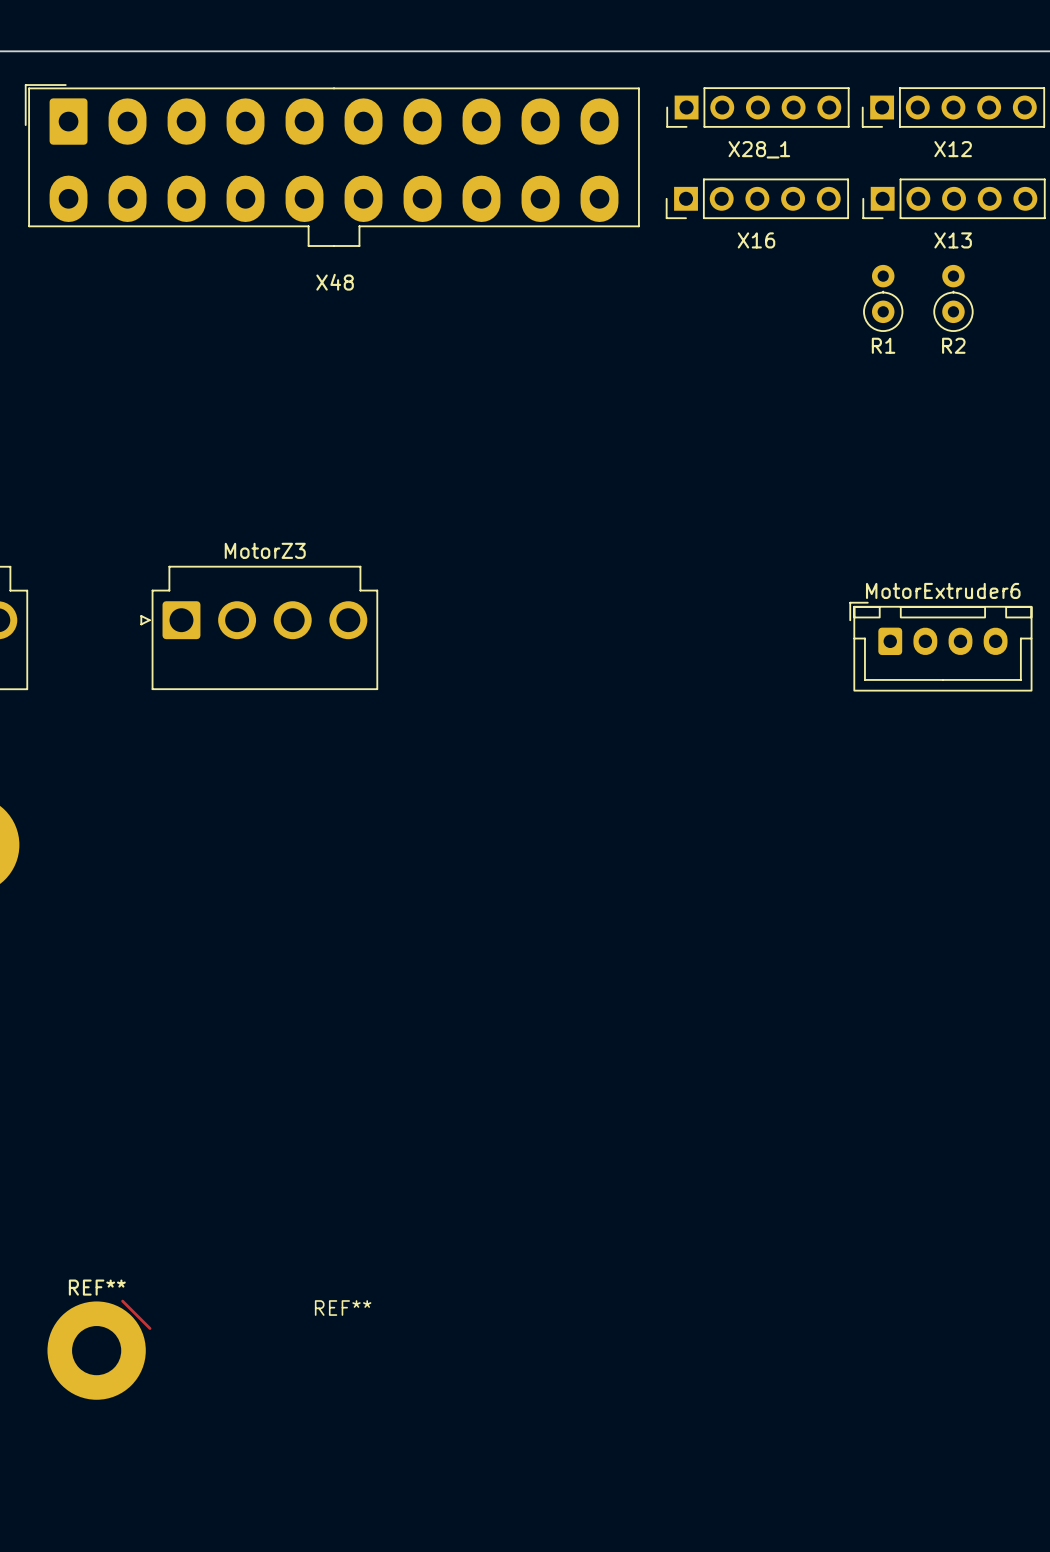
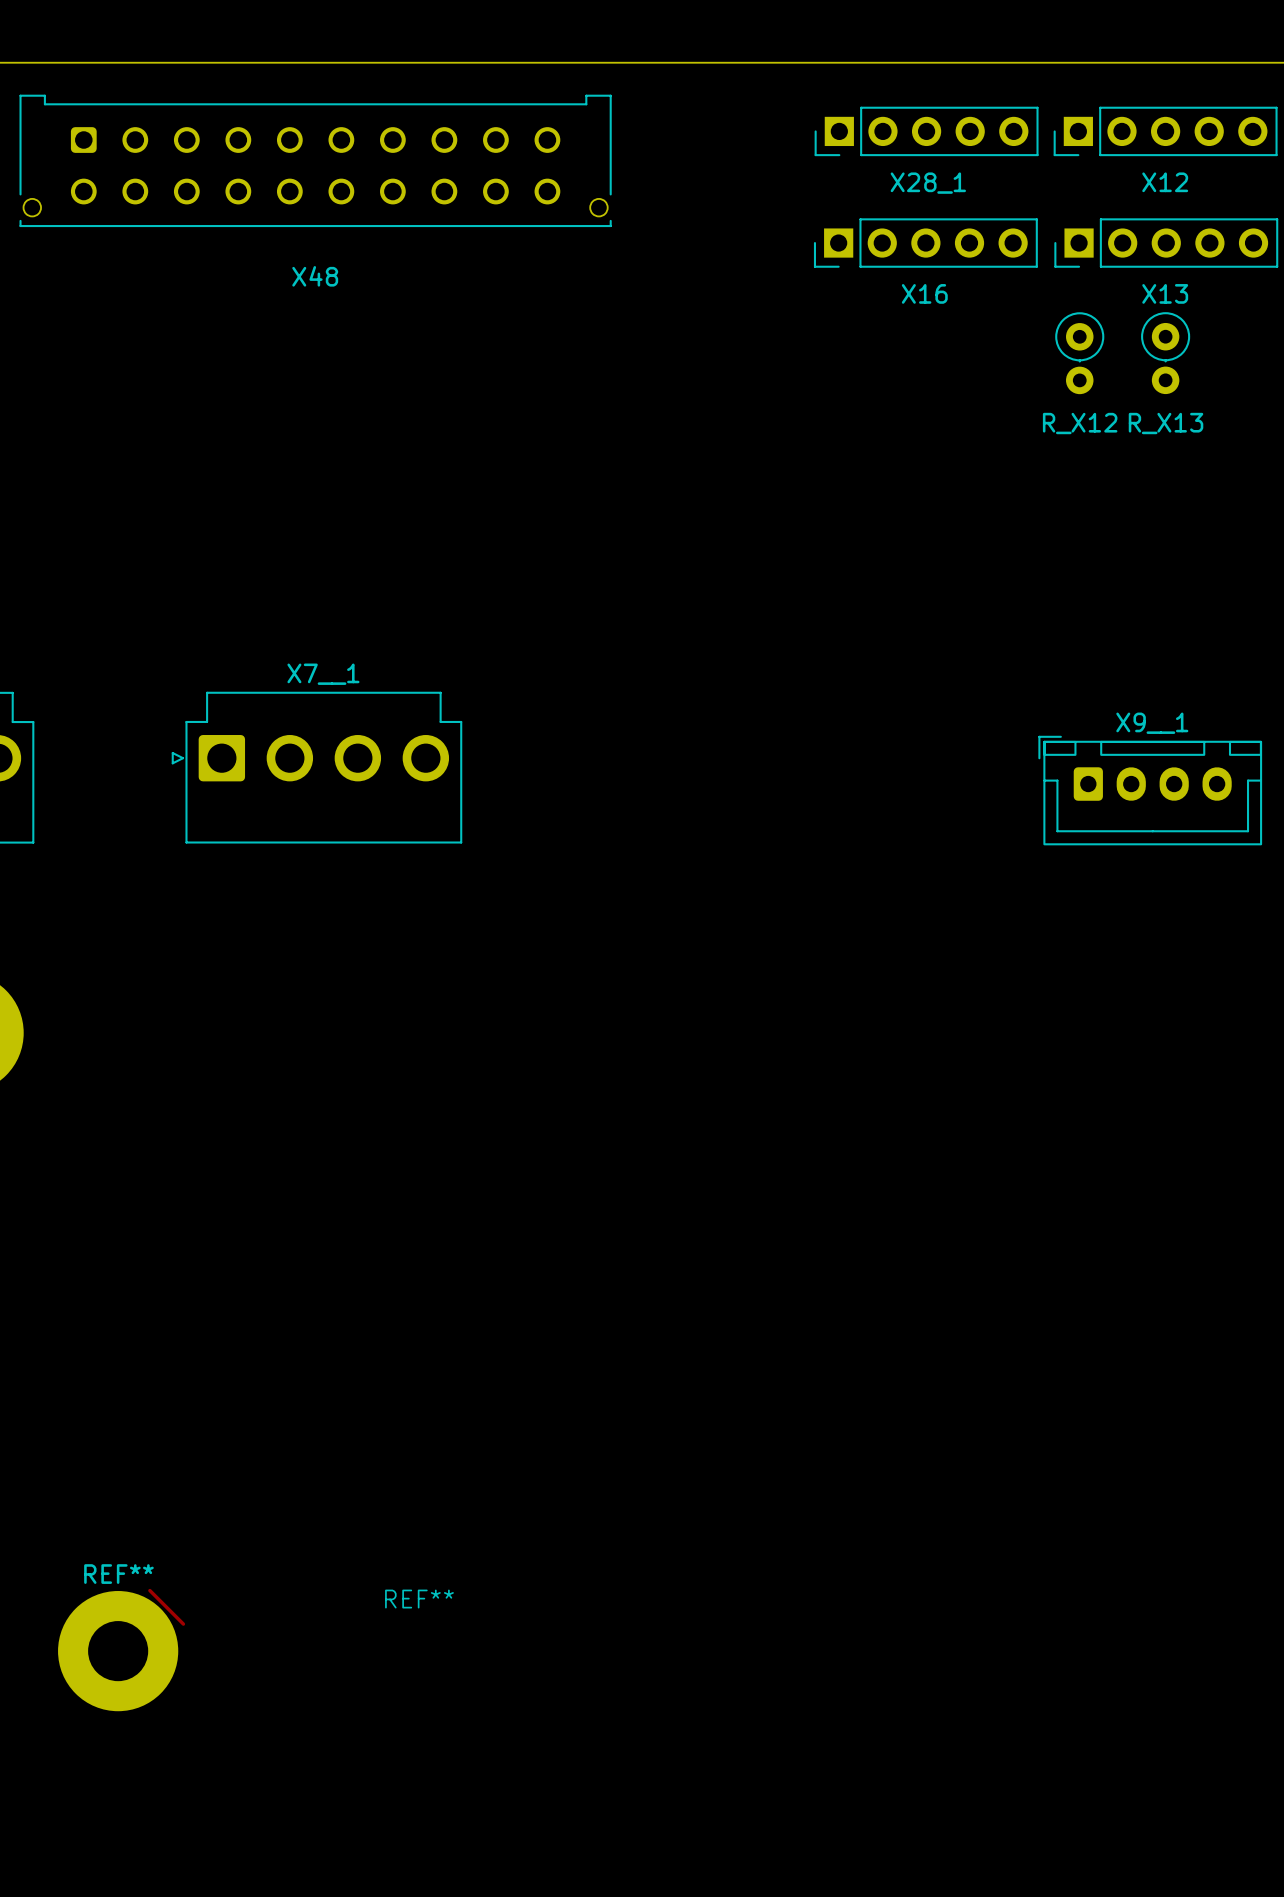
X48 footprint: [24, 84, 640, 247] -> [19, 94, 612, 228]
R_X12: none -> (1079, 353)
R_X13: none -> (1165, 353)
R1: (883, 298) -> none
R2: (953, 298) -> none
MotorZ3 name: MotorZ3 (265, 550) -> X7__1 (323, 674)
MotorExtruder6 name: MotorExtruder6 (943, 590) -> X9__1 (1152, 723)

